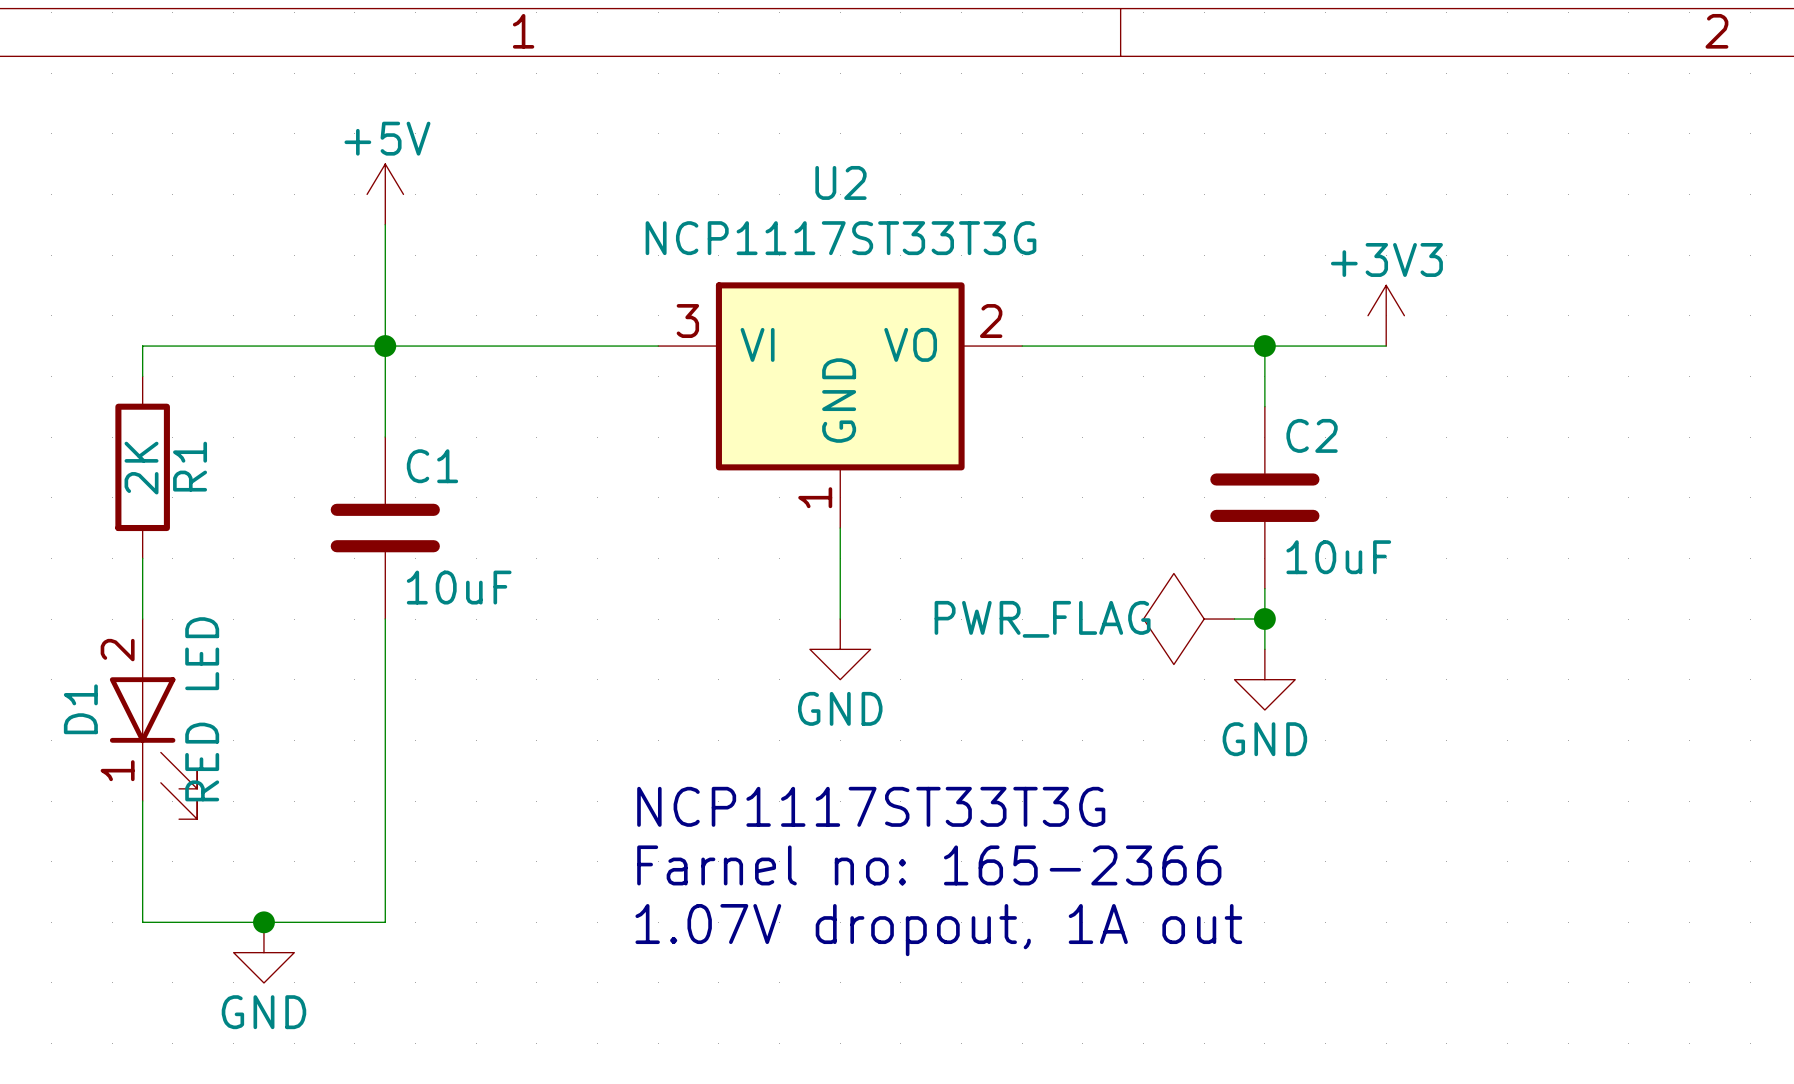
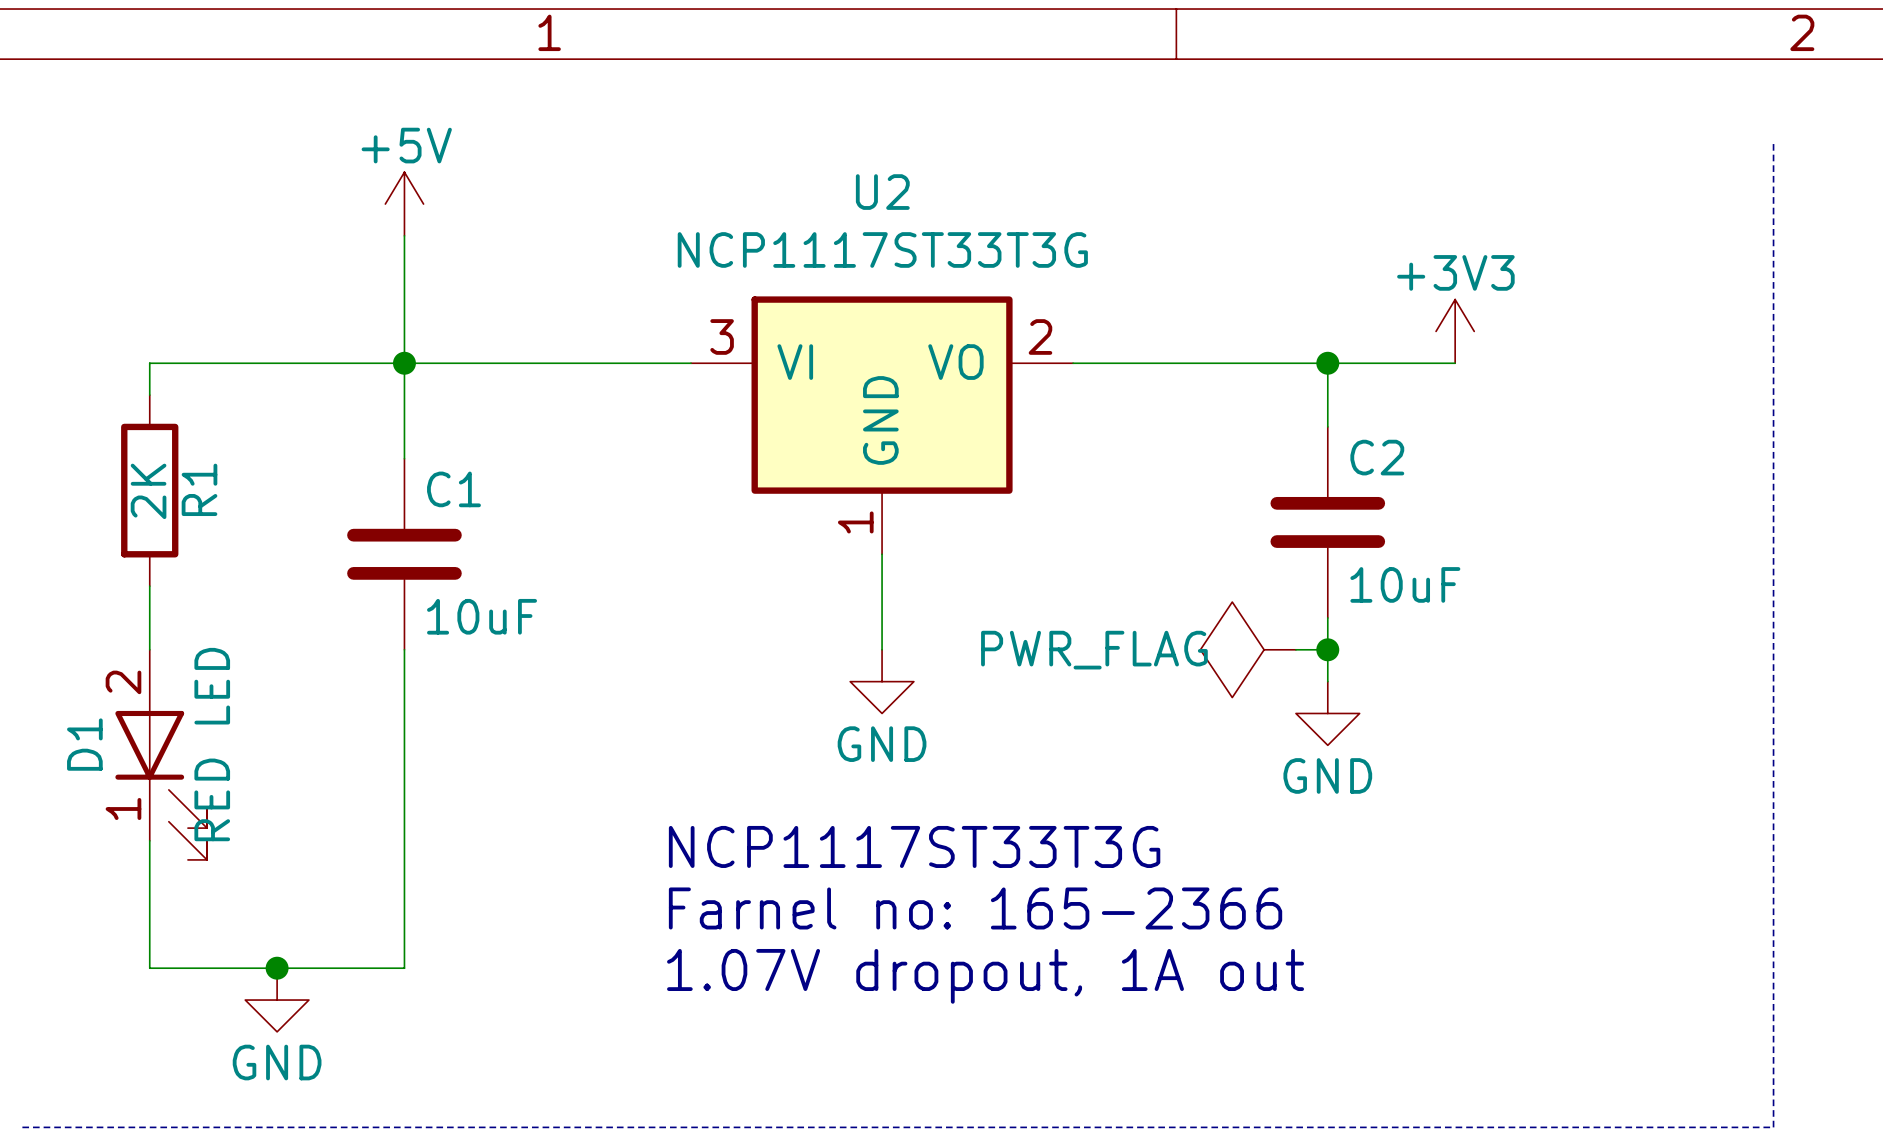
line: none -> (1773, 140) (1773, 1127) (22, 1127)

